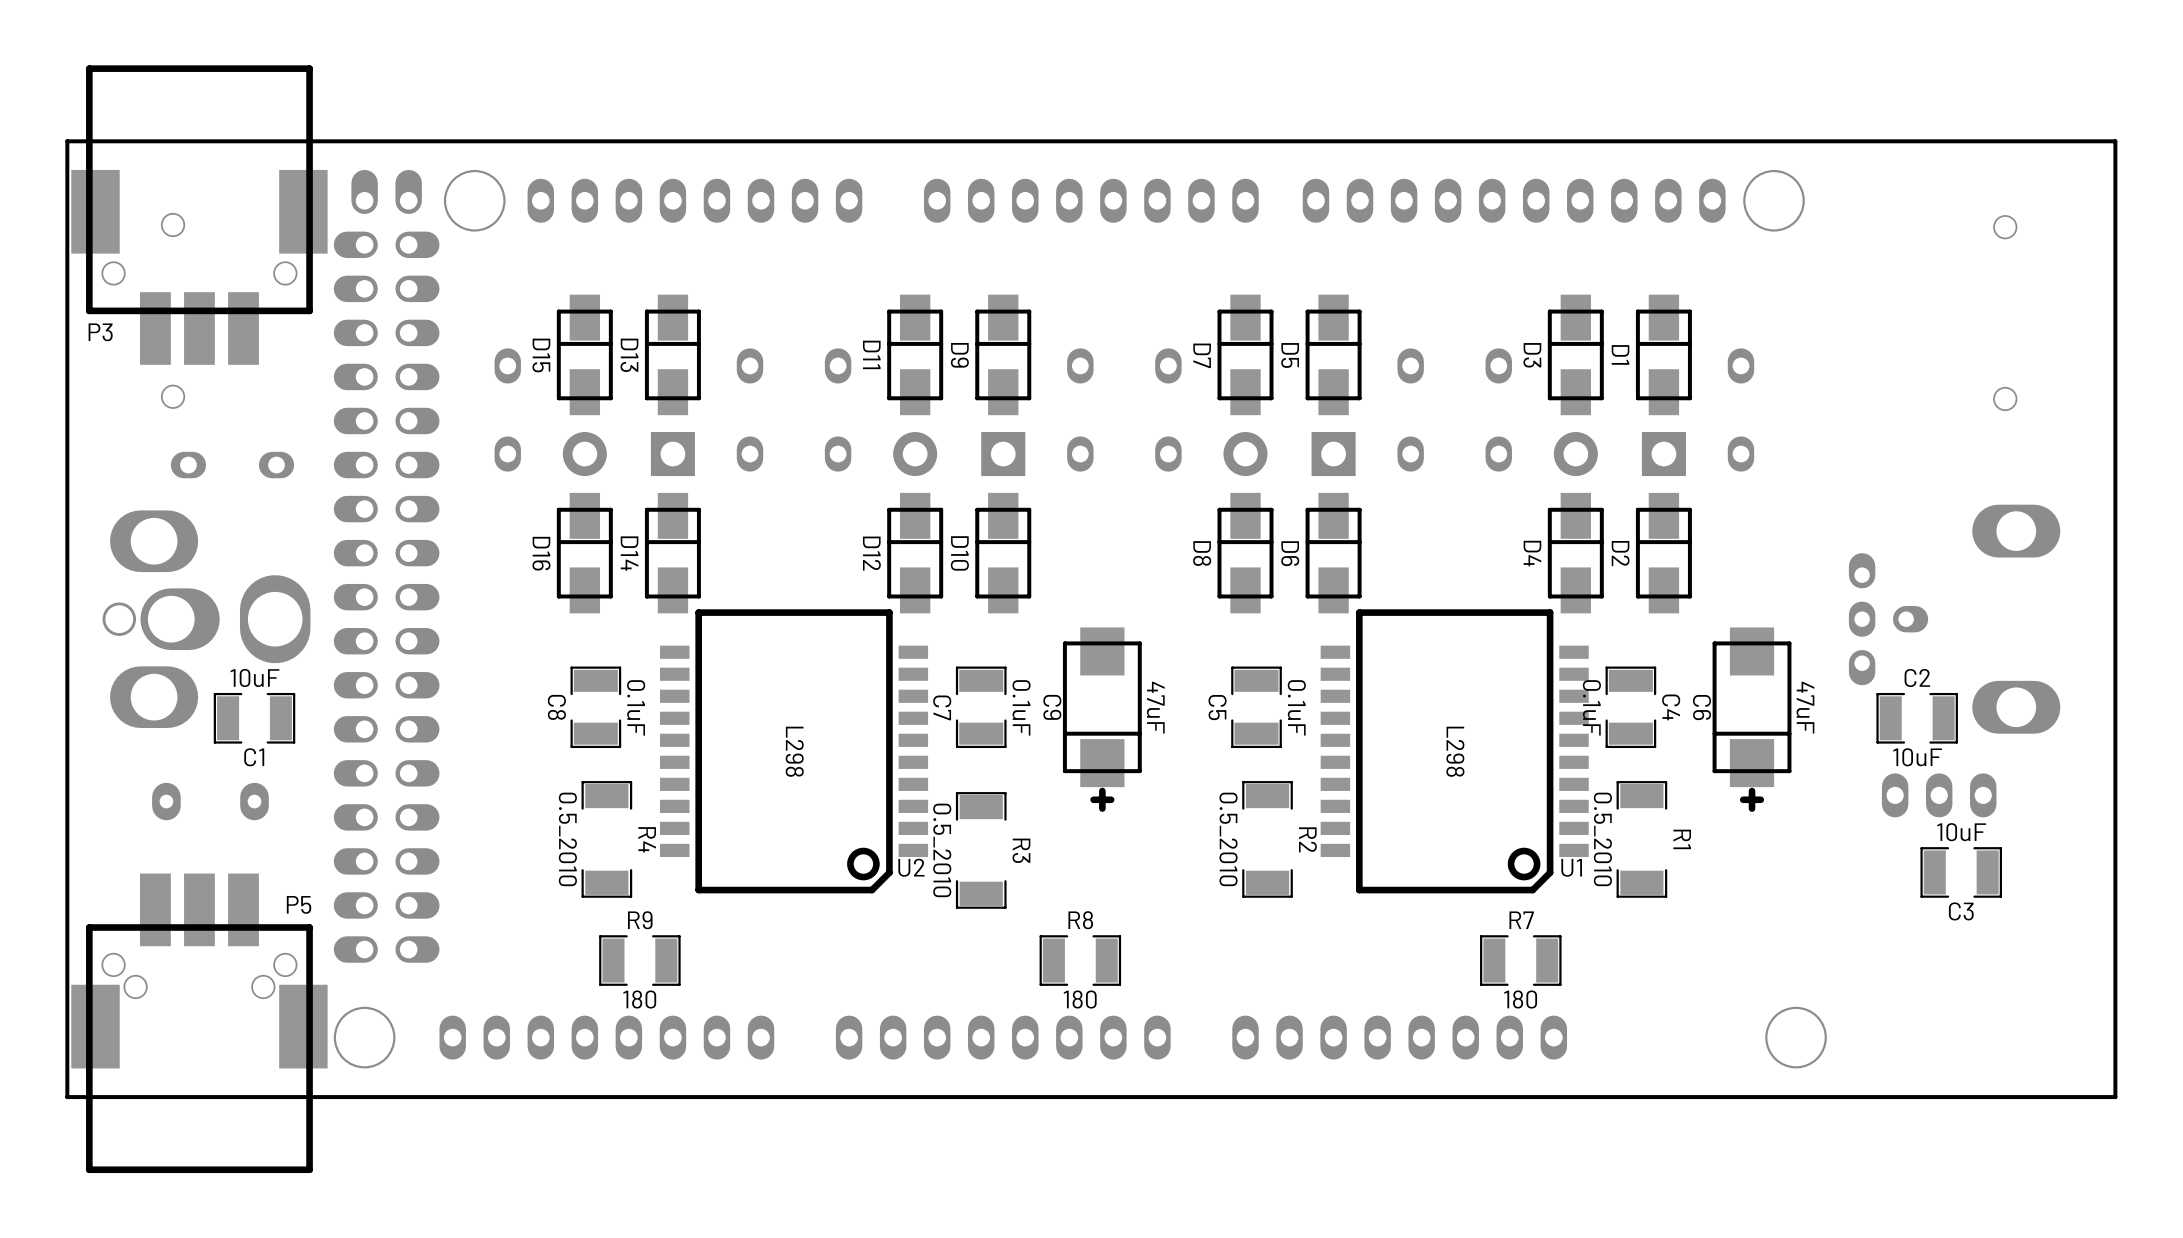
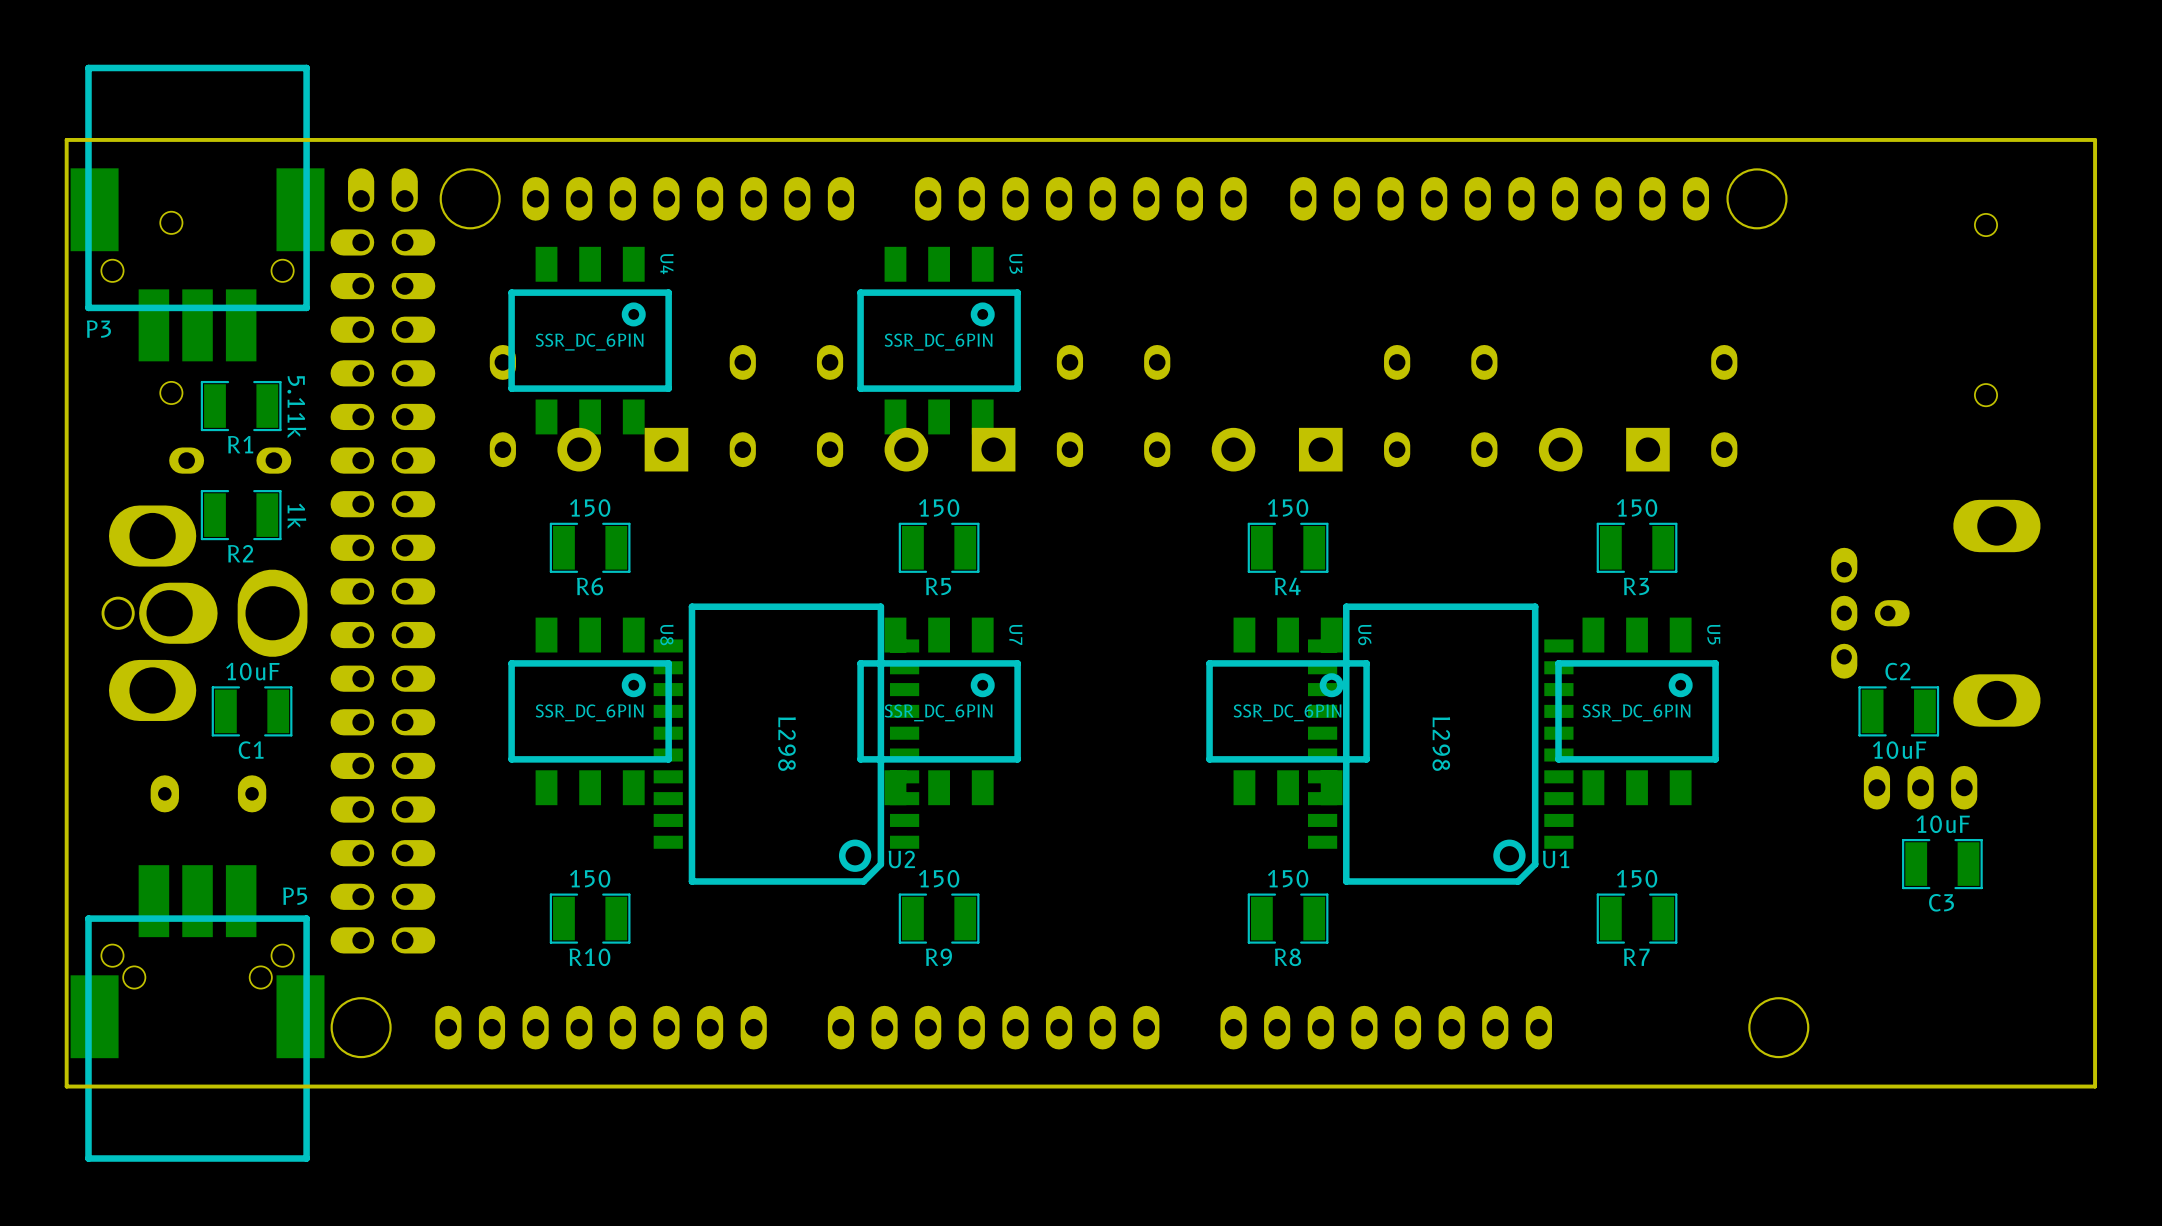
U4: none -> SSR_DC_6PIN (590, 340)
U3: none -> SSR_DC_6PIN (939, 340)
D15: (584, 354) -> none
D13: (672, 354) -> none
D11: (915, 354) -> none
D9: (1003, 354) -> none
D7: (1245, 354) -> none
D5: (1333, 354) -> none
D3: (1575, 354) -> none
D1: (1663, 354) -> none
D16: (584, 553) -> none
R6: none -> 150 (590, 547)
D14: (672, 553) -> none
D12: (915, 553) -> none
R5: none -> 150 (939, 547)
D10: (1003, 553) -> none
D8: (1245, 553) -> none
D6: (1333, 553) -> none
D4: (1575, 553) -> none
D2: (1663, 553) -> none
C8: 0.1uF (595, 707) -> none
C7: 0.1uF (981, 707) -> none
C5: 0.1uF (1256, 707) -> none
C4: 0.1uF (1630, 707) -> none
U8: none -> SSR_DC_6PIN (590, 711)
U7: none -> SSR_DC_6PIN (939, 711)
U6: none -> SSR_DC_6PIN (1288, 711)
U5: none -> SSR_DC_6PIN (1637, 711)
C9: 47uF (1102, 719) -> none
C6: 47uF (1752, 719) -> none
R4 footprint: [581, 781, 633, 898] -> [1247, 522, 1329, 573]
R2 footprint: [1242, 781, 1293, 898] -> [200, 490, 282, 541]
R1 footprint: [1616, 781, 1668, 898] -> [200, 380, 282, 432]
R3 footprint: [955, 792, 1007, 909] -> [1596, 522, 1678, 573]
R4 value: 0.5_2010 (567, 839) -> 150 (1288, 508)
R4 name position: R4 (647, 839) -> R4 (1287, 586)
R2 value: 0.5_2010 (1228, 839) -> 1k (296, 516)
R2 name position: R2 (1307, 839) -> R2 (240, 553)
R1 value: 0.5_2010 (1602, 839) -> 5.11k (296, 407)
R1 name position: R1 (1682, 839) -> R1 (240, 444)
R3 value: 0.5_2010 (942, 850) -> 150 (1637, 508)
R3 name position: R3 (1021, 850) -> R3 (1636, 586)
R9 name position: R9 (640, 920) -> R9 (938, 957)
R8 name position: R8 (1080, 920) -> R8 (1287, 957)
R7 name position: R7 (1521, 920) -> R7 (1636, 957)
R10: none -> 150 (590, 918)
R9 position: (639, 960) -> (939, 918)
R8 position: (1080, 960) -> (1288, 918)
R7 position: (1520, 960) -> (1637, 918)
R9 value: 180 (639, 999) -> 150 (939, 878)
R8 value: 180 (1080, 999) -> 150 (1288, 878)
R7 value: 180 (1520, 999) -> 150 (1637, 878)

